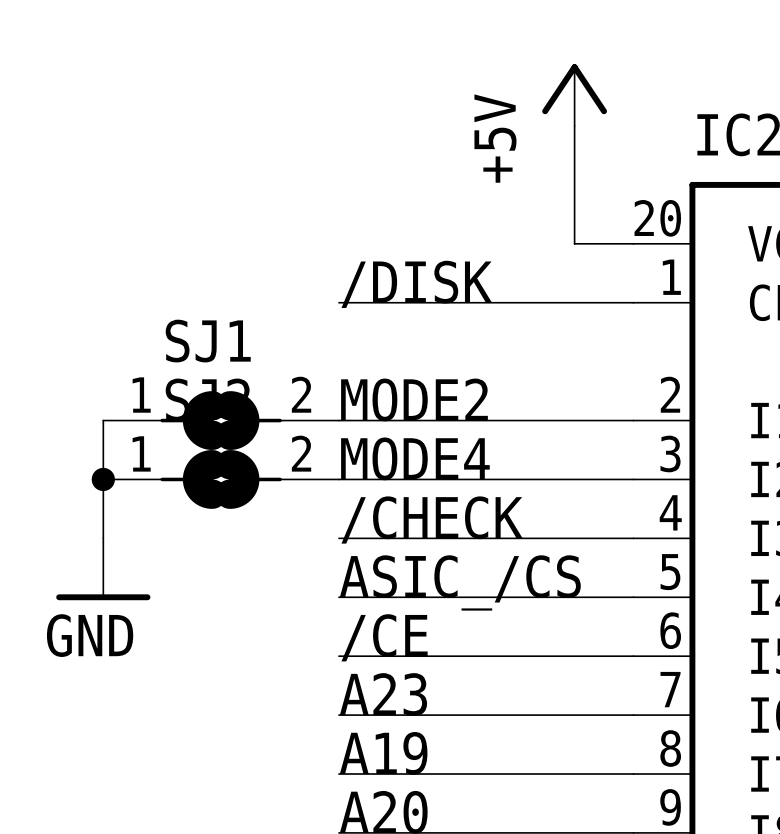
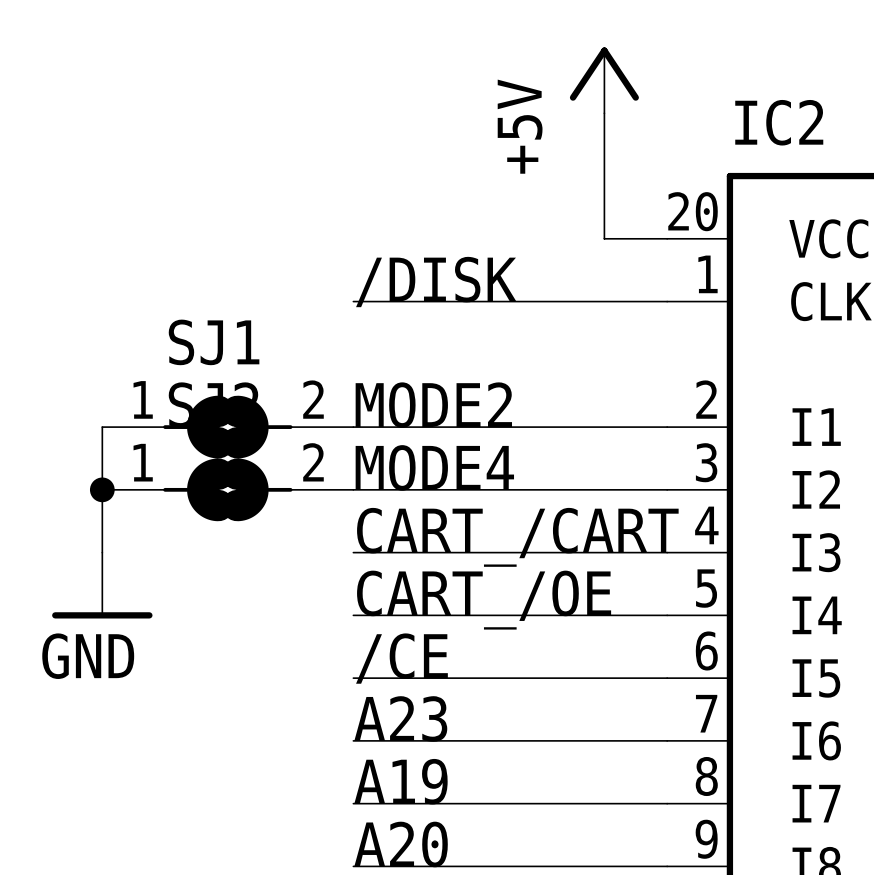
label: /CHECK (432, 520) -> CART_/CART (517, 537)
label: ASIC_/CS (460, 582) -> CART_/OE (484, 600)

